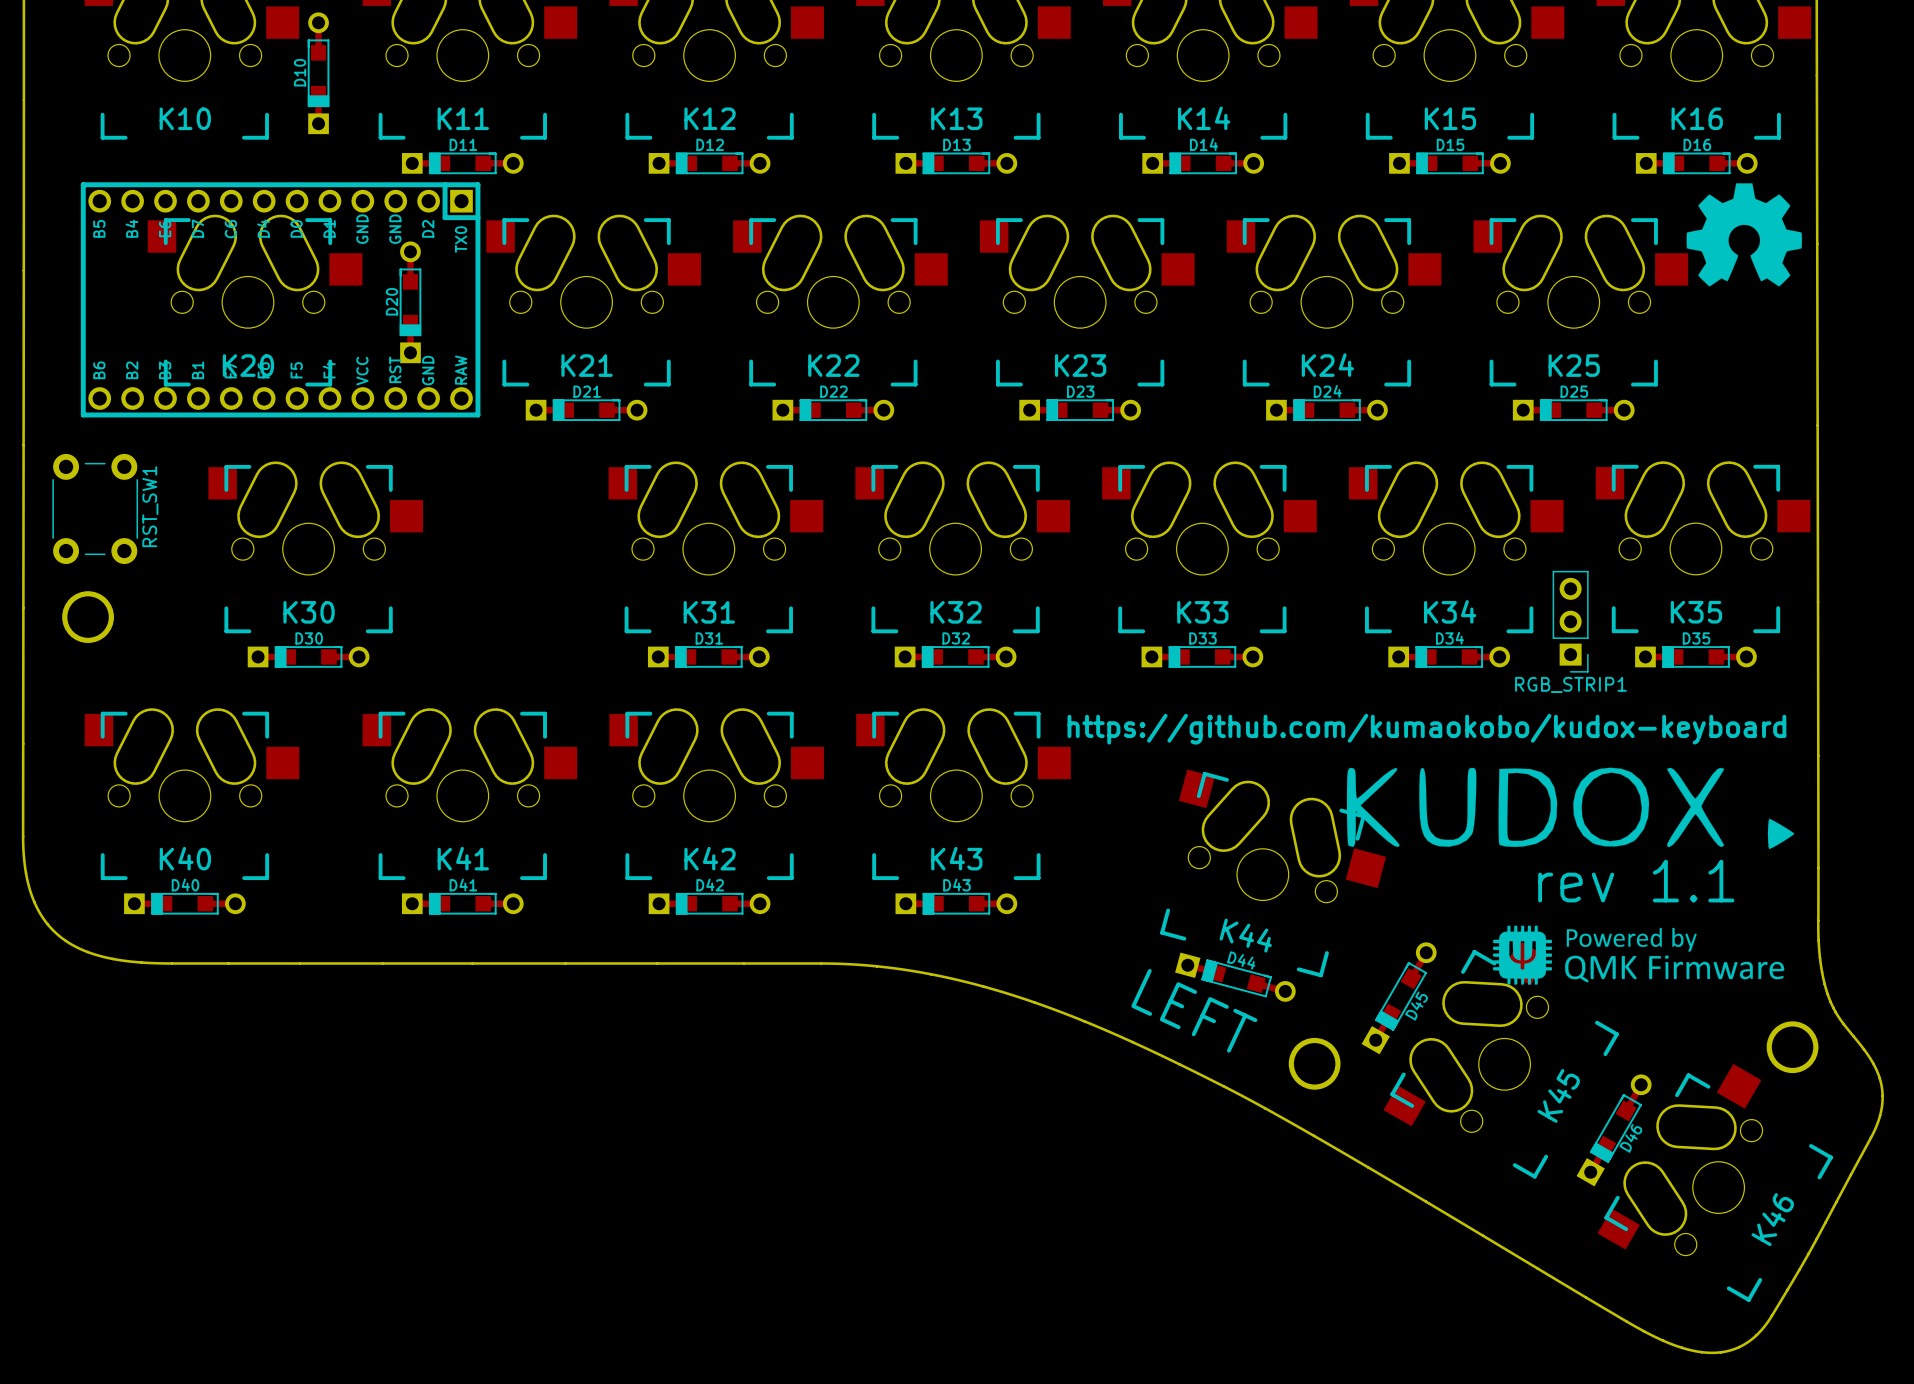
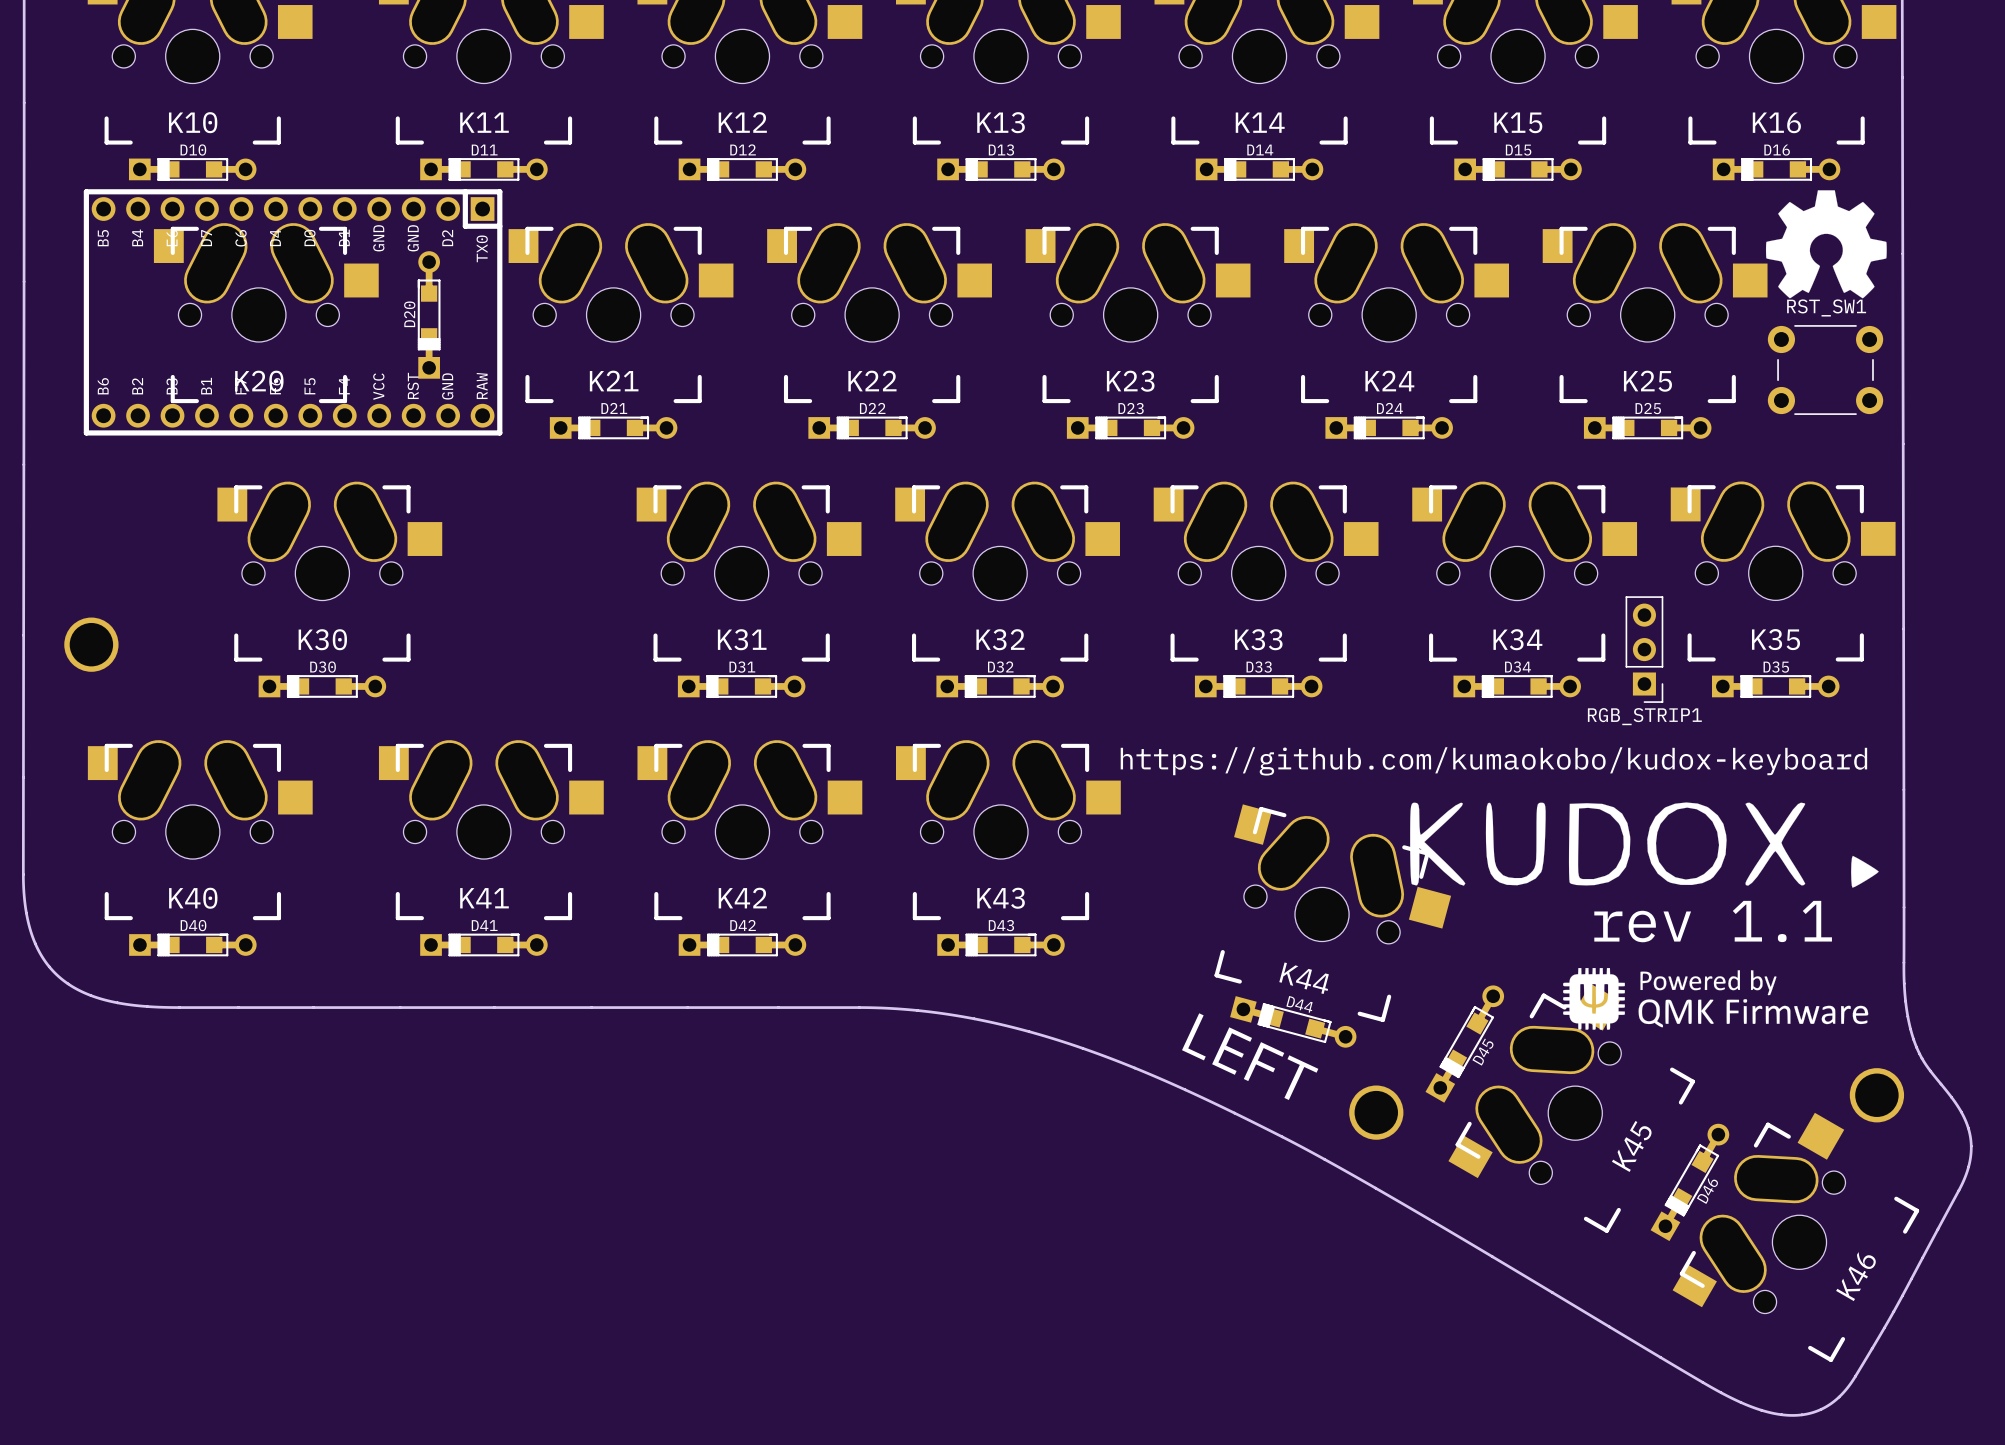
D10 rotation: 0° (318, 73) -> 90° clockwise (192, 169)
D10 position: (318, 73) -> (192, 169)
RST_SW1 name position: RST_SW1 (150, 506) -> RST_SW1 (1826, 307)
RST_SW1 rotation: 0° (95, 508) -> 90° clockwise (1825, 370)
RST_SW1 position: (95, 508) -> (1825, 370)

